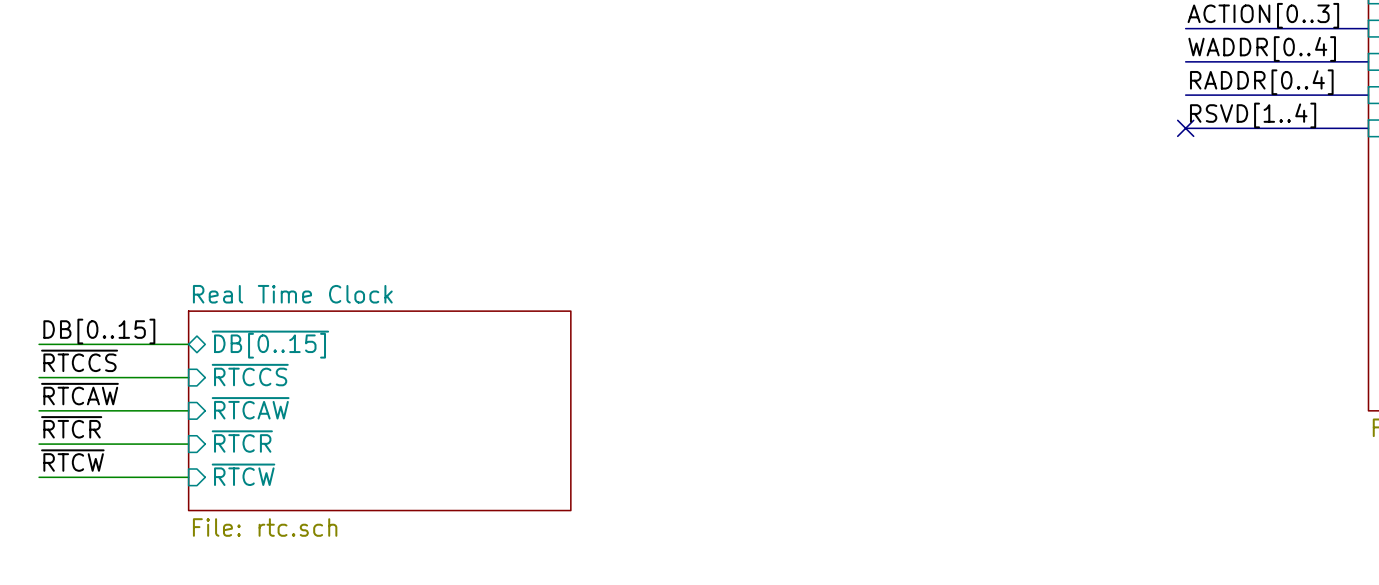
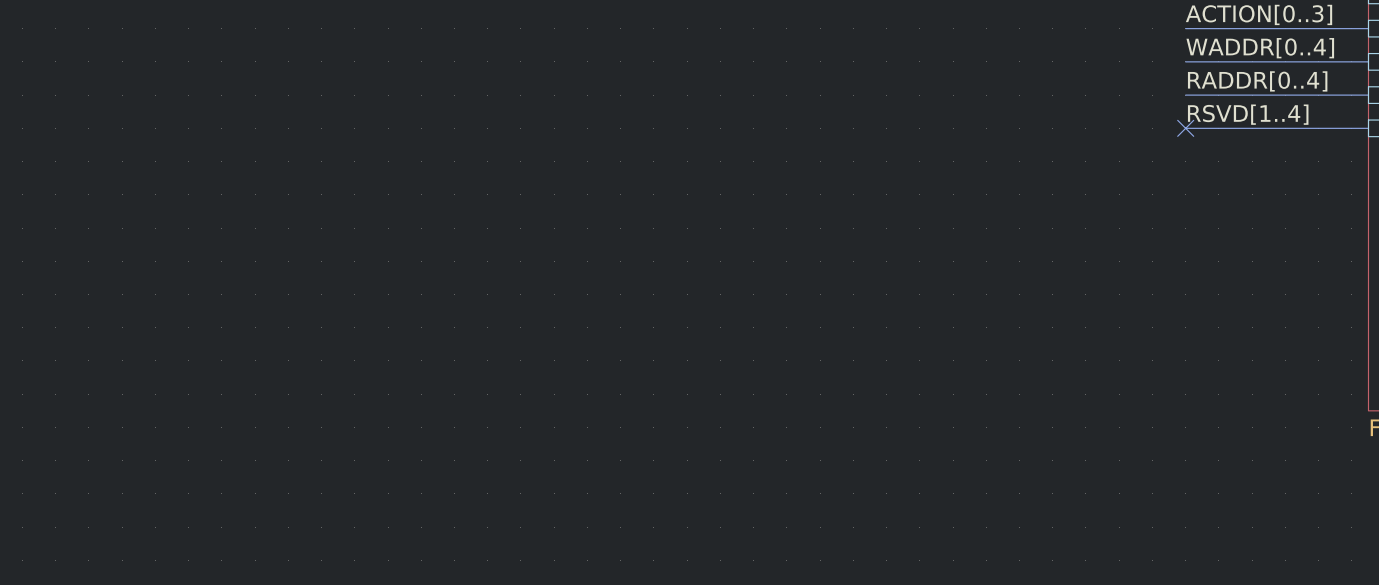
label: DB[0..15] (99, 331) -> none
wire: (39, 344) (188, 344) -> none
sheet pin: ~{DB[0..15]} (270, 344) -> none
label: ~{RTCCS} (79, 360) -> none
sheet pin: ~{RTCCS} (250, 375) -> none
wire: (39, 377) (188, 377) -> none
label: ~{RTCAW} (79, 394) -> none
sheet pin: ~{RTCAW} (250, 408) -> none
wire: (39, 410) (188, 410) -> none
sheet Real Time Clock: File: rtc.sch (379, 410) -> none
label: ~{RTCR} (71, 427) -> none
sheet pin: ~{RTCR} (242, 441) -> none
wire: (39, 444) (188, 444) -> none
label: ~{RTCW} (72, 460) -> none
sheet pin: ~{RTCW} (243, 474) -> none
wire: (39, 477) (188, 477) -> none

